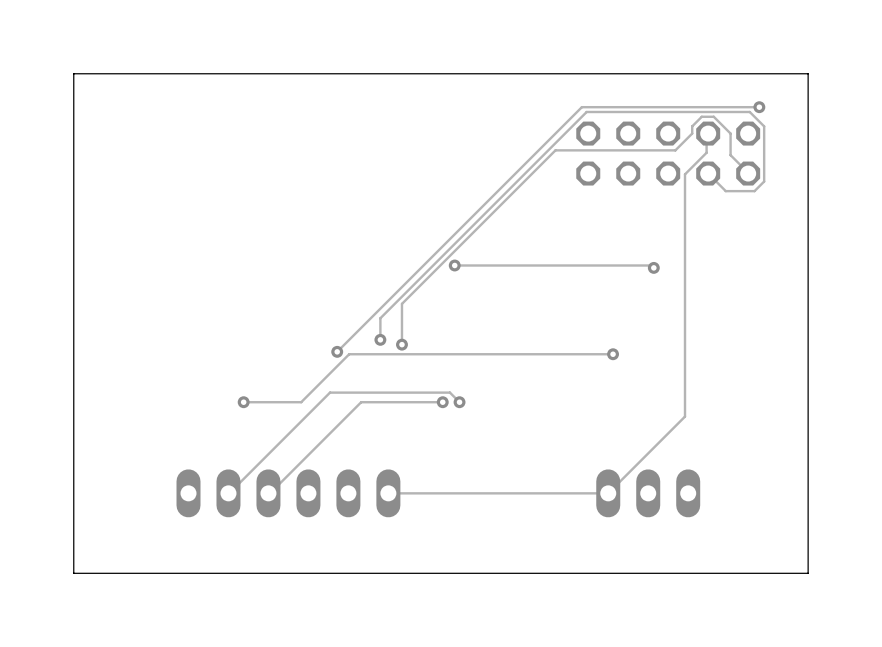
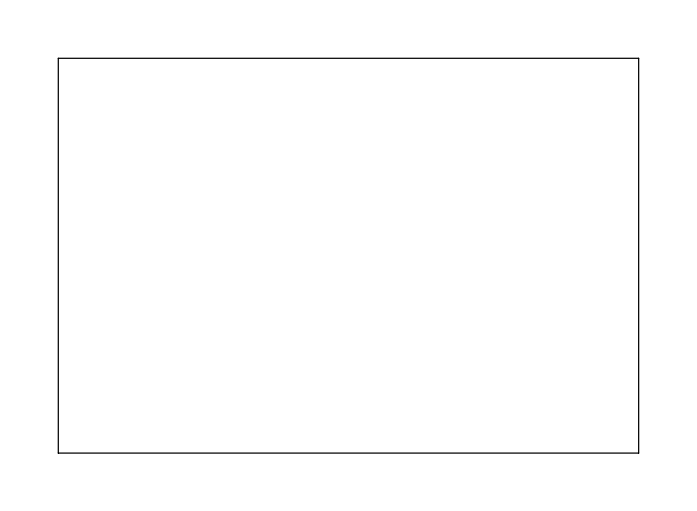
track: (759, 107) (581, 107) (337, 351) -> none
via: (759, 107) -> none
track: (708, 133) (706, 133) (706, 152) (685, 174) (685, 416) (608, 493) (388, 493) -> none
part: (668, 153) -> none
track: (708, 173) (725, 191) (754, 191) (764, 181) (764, 126) (749, 111) (586, 111) (380, 318) (380, 339) -> none
track: (748, 173) (730, 155) (730, 133) (713, 116) (701, 116) (692, 126) (692, 133) (675, 150) (555, 150) (401, 303) (401, 344) -> none
track: (454, 265) (651, 265) (653, 267) -> none
via: (454, 265) -> none
via: (653, 267) -> none
via: (380, 339) -> none
via: (401, 344) -> none
via: (337, 351) -> none
track: (613, 354) (349, 354) (301, 402) (243, 402) -> none
via: (613, 354) -> none
via: (243, 402) -> none
track: (442, 402) (361, 402) (268, 493) -> none
via: (442, 402) -> none
track: (459, 402) (449, 392) (330, 392) (228, 493) -> none
via: (459, 402) -> none
part: (288, 493) -> none
part: (648, 493) -> none

